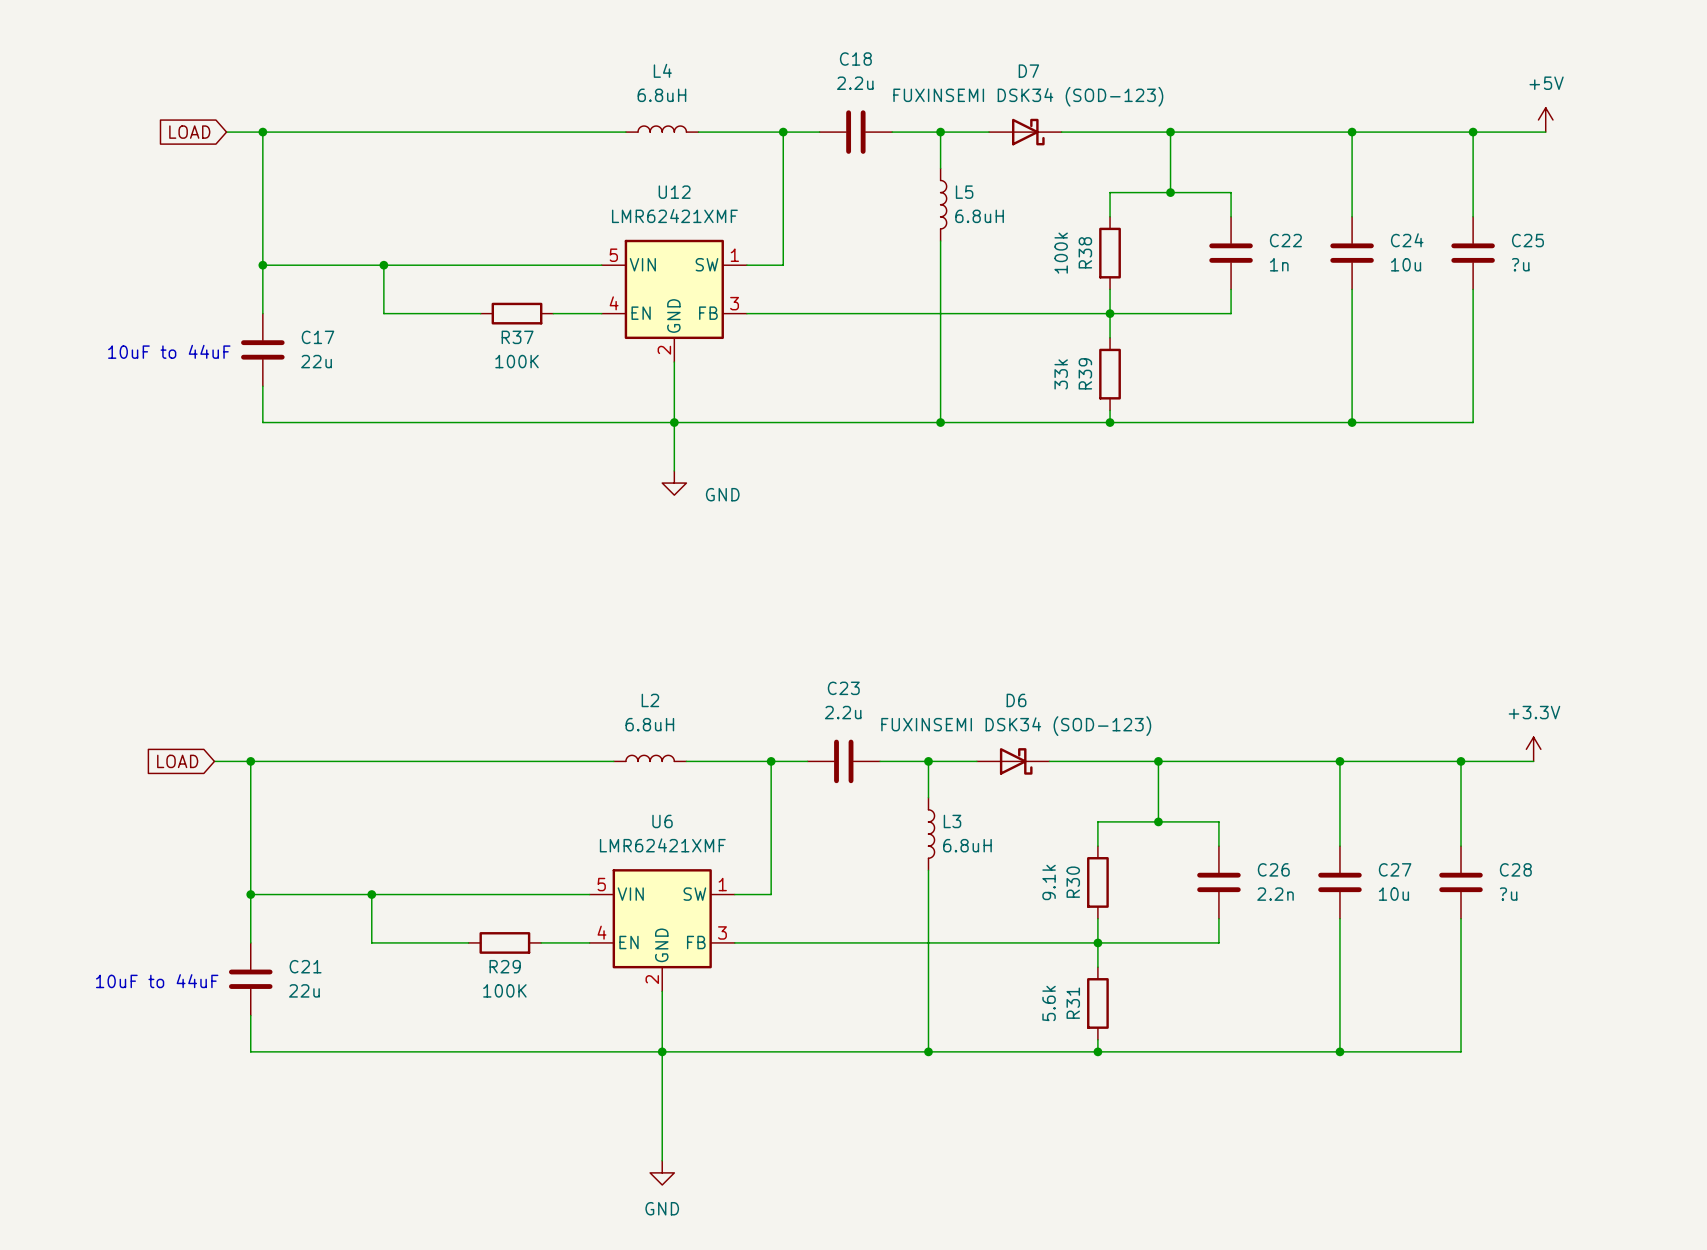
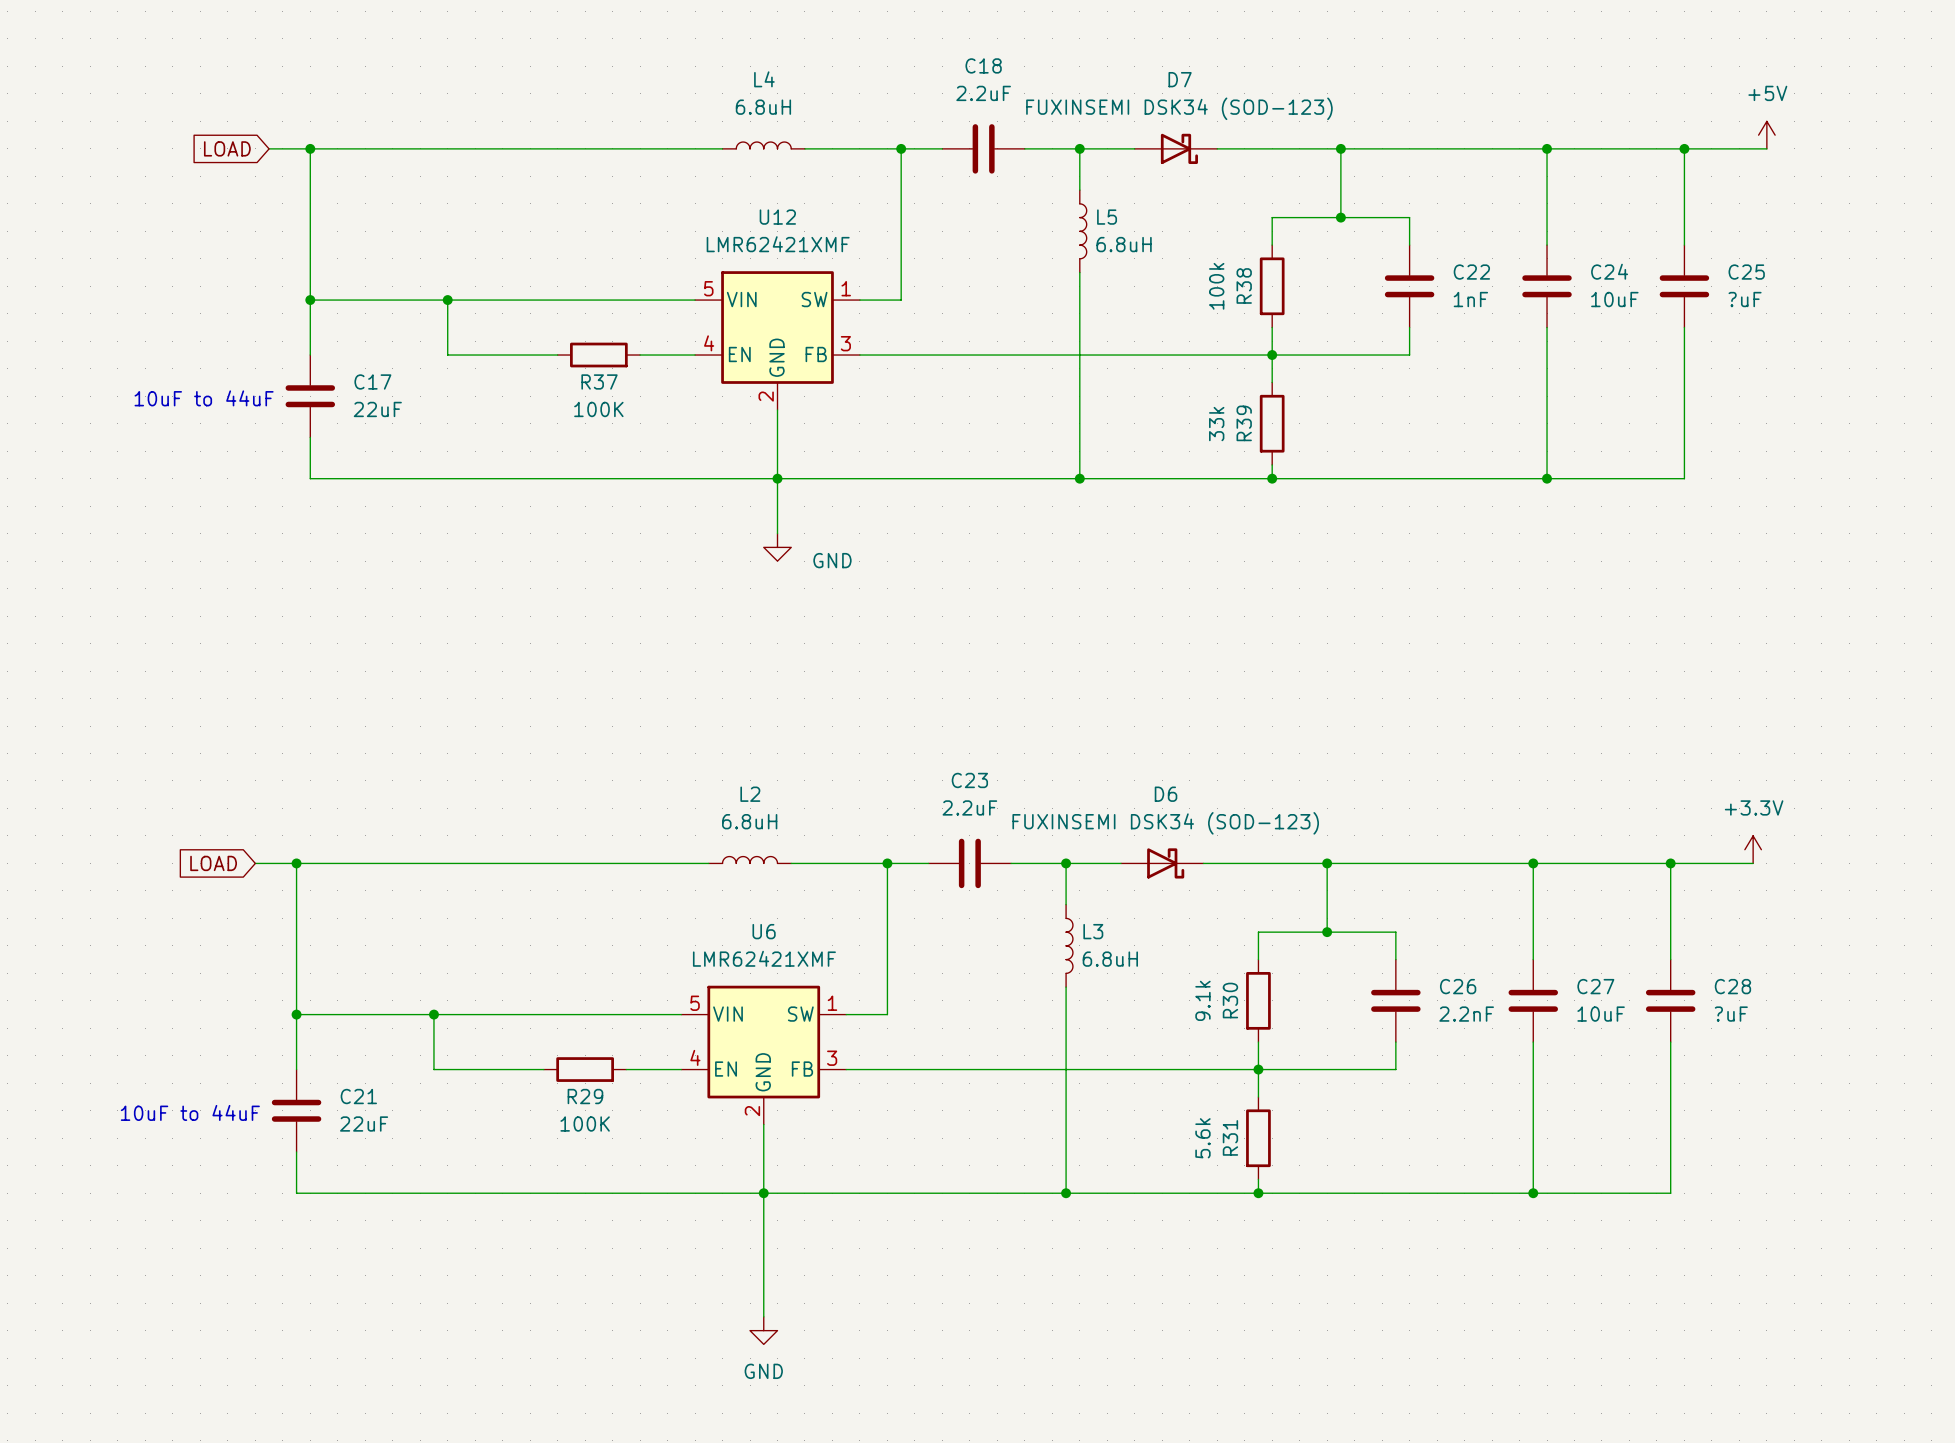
C18 value: 2.2u (855, 83) -> 2.2uF (983, 93)
C22 value: 1n (1279, 264) -> 1nF (1470, 299)
C24 value: 10u (1406, 264) -> 10uF (1614, 299)
C25 value: ?u (1520, 264) -> ?uF (1745, 299)
C17 value: 22u (316, 361) -> 22uF (377, 409)
C23 value: 2.2u (843, 712) -> 2.2uF (969, 807)
C26 value: 2.2n (1275, 894) -> 2.2nF (1466, 1014)
C27 value: 10u (1393, 894) -> 10uF (1601, 1014)
C28 value: ?u (1508, 894) -> ?uF (1731, 1014)
C21 value: 22u (304, 990) -> 22uF (364, 1124)

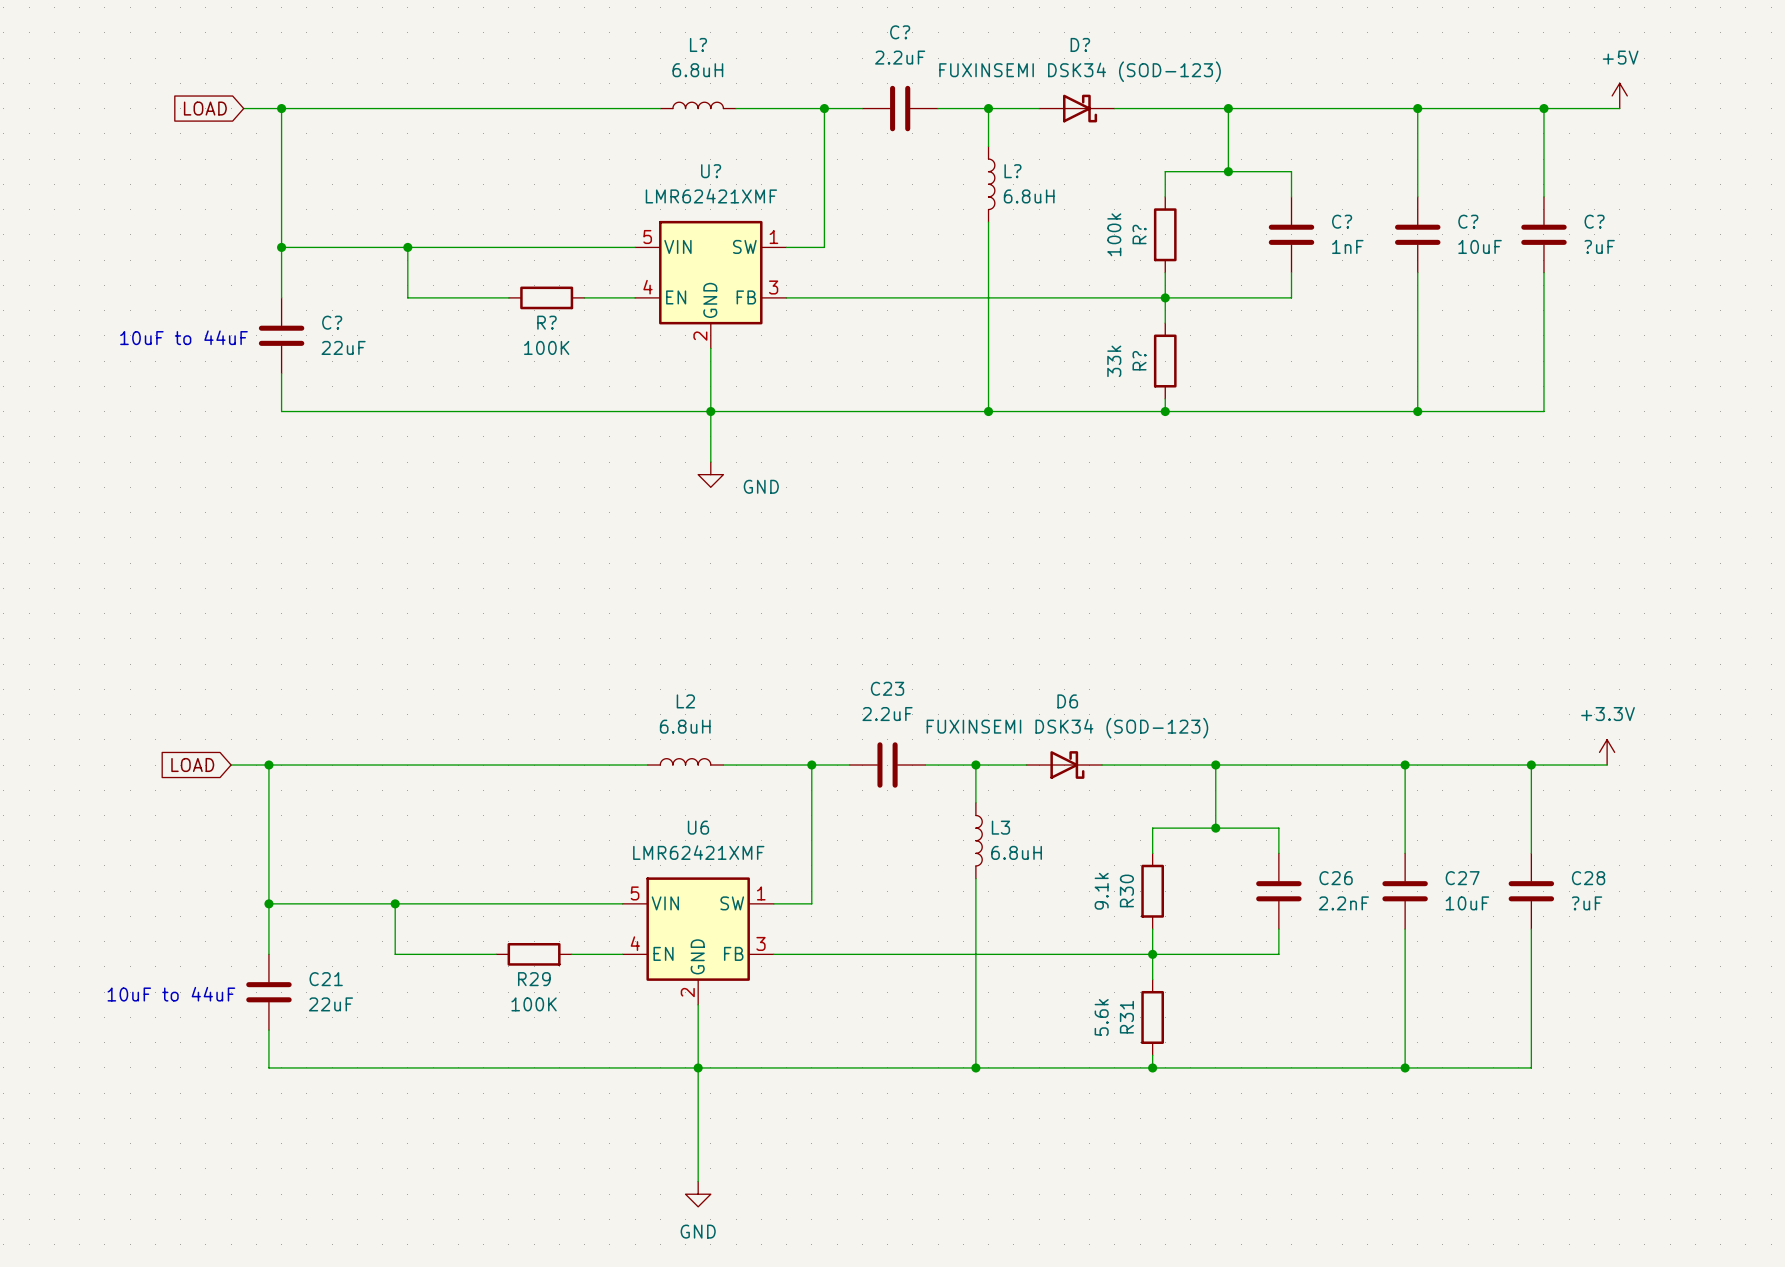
C18 name: C18 (983, 65) -> C? (900, 32)
L4 name: L4 (764, 79) -> L? (698, 44)
D7 name: D7 (1180, 79) -> D? (1080, 44)
U12 name: U12 (777, 217) -> U? (711, 171)
L5 name: L5 (1107, 217) -> L? (1012, 171)
C24 name: C24 (1609, 271) -> C? (1468, 221)
C22 name: C22 (1471, 272) -> C? (1342, 221)
C25 name: C25 (1746, 272) -> C? (1594, 221)
R38 name: R38 (1244, 285) -> R? (1139, 234)
C17 name: C17 (372, 381) -> C? (332, 322)
R37 name: R37 (599, 381) -> R? (546, 322)
R39 name: R39 (1244, 423) -> R? (1139, 360)

